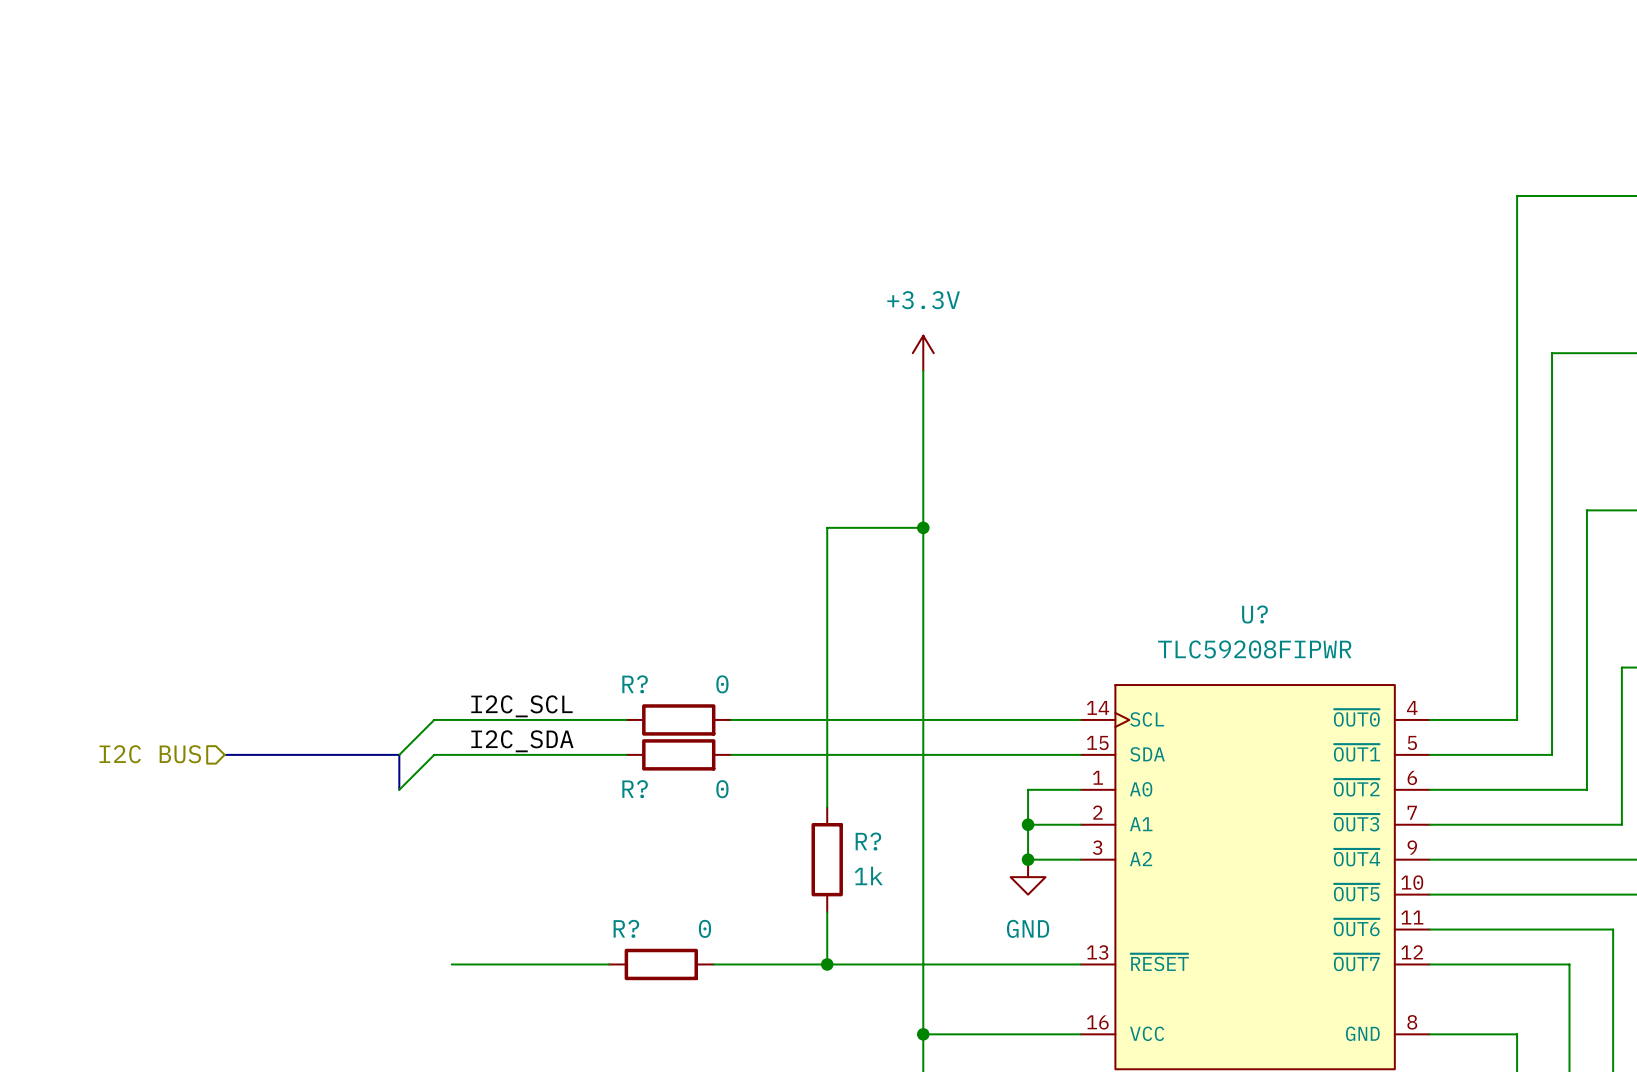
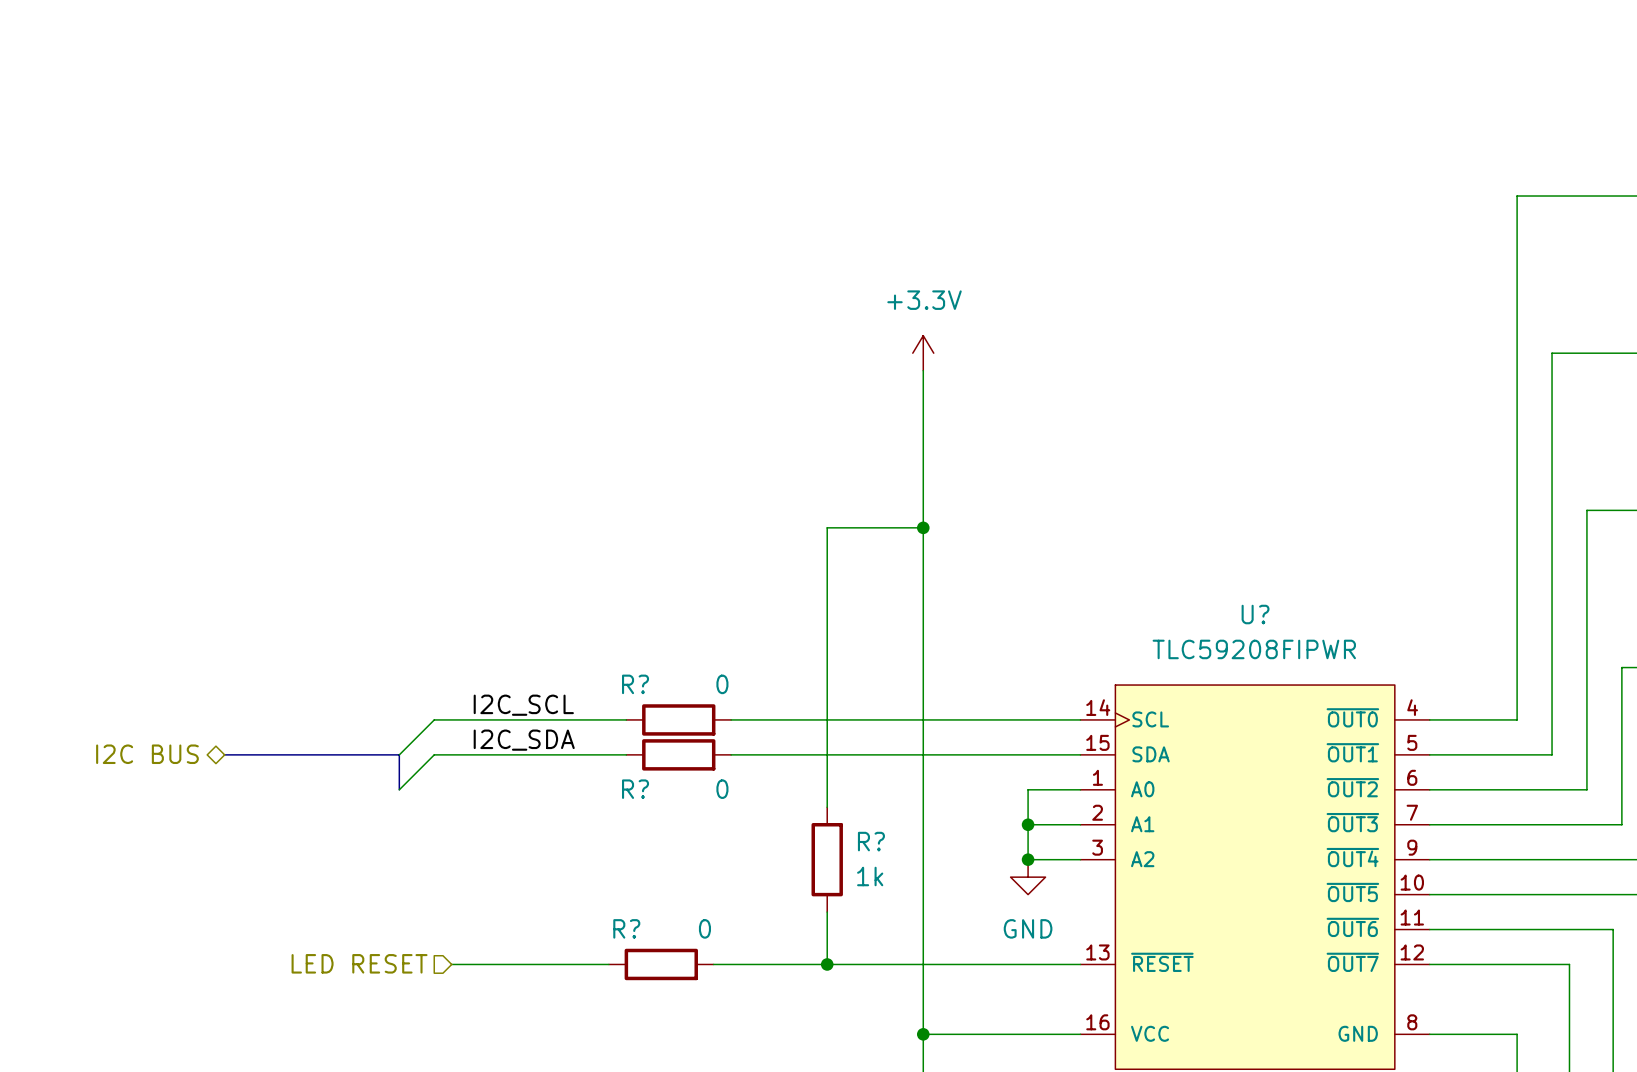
hierarchical label shape: input (150, 754) -> bidirectional (147, 754)
hierarchical label: none -> LED RESET (359, 963)

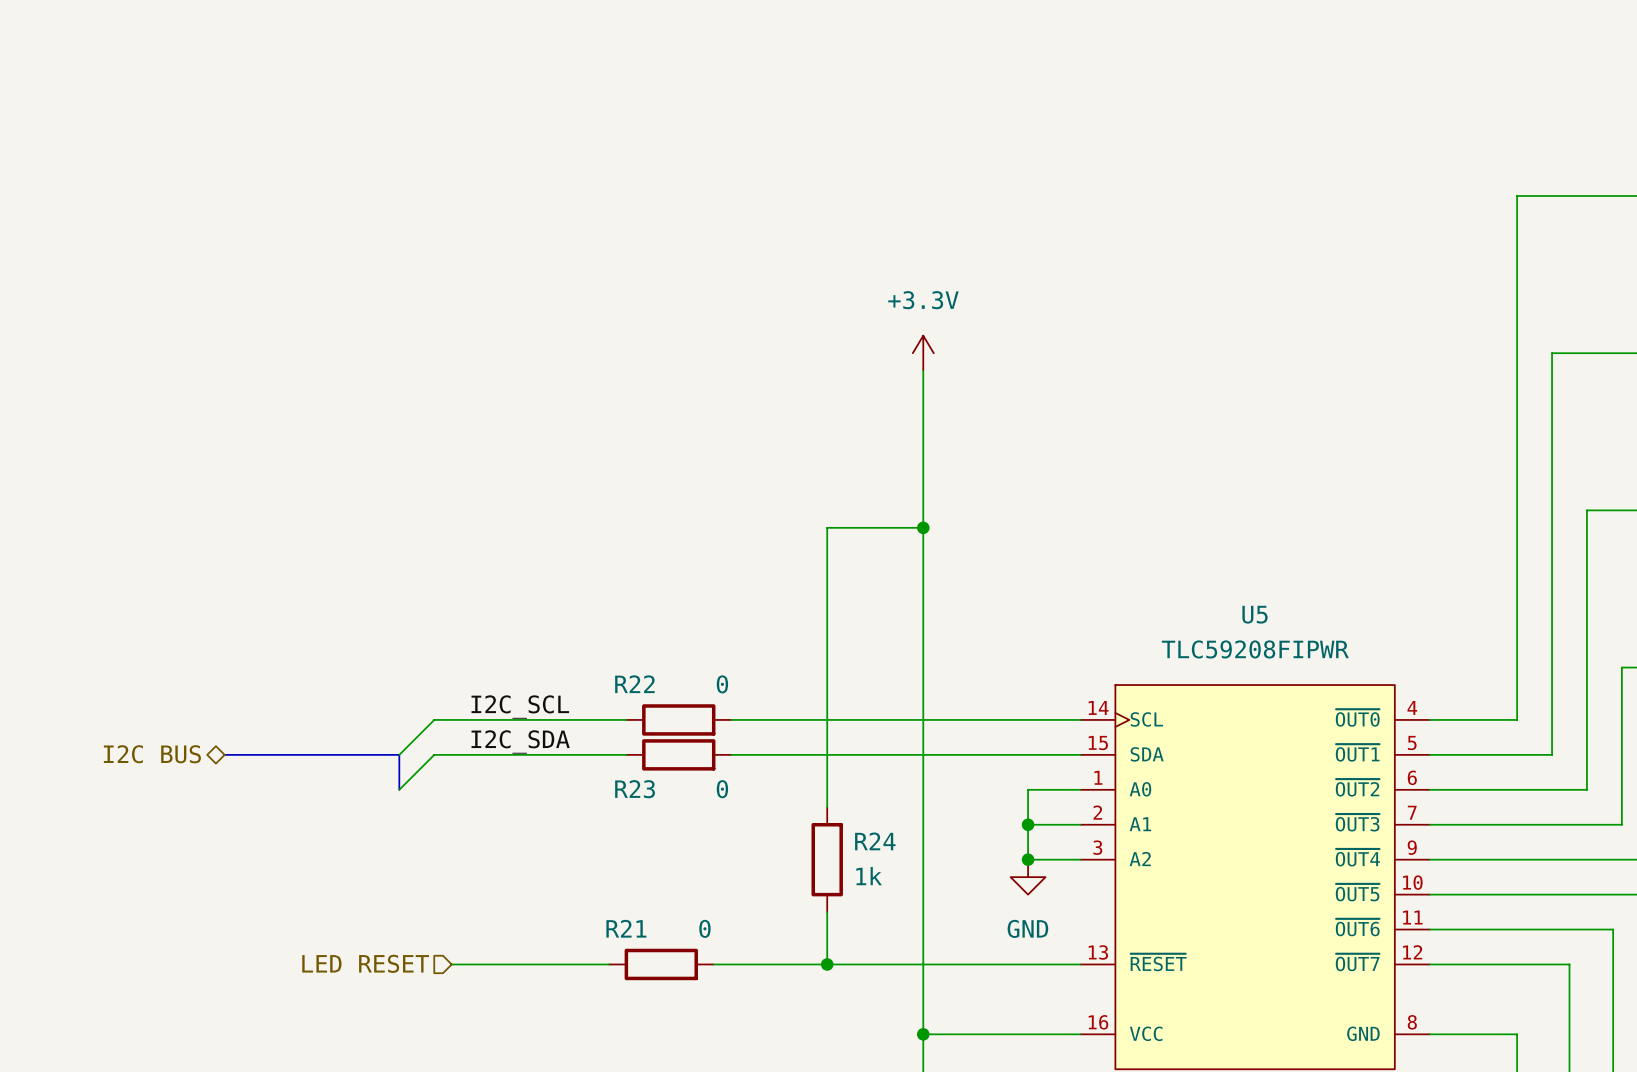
U? name: U? (1255, 614) -> U5 (1255, 614)
R? name: R? (635, 684) -> R22 (634, 684)
R? name: R? (635, 789) -> R23 (635, 789)
R? name: R? (871, 841) -> R24 (875, 841)
R? name: R? (626, 928) -> R21 (626, 928)

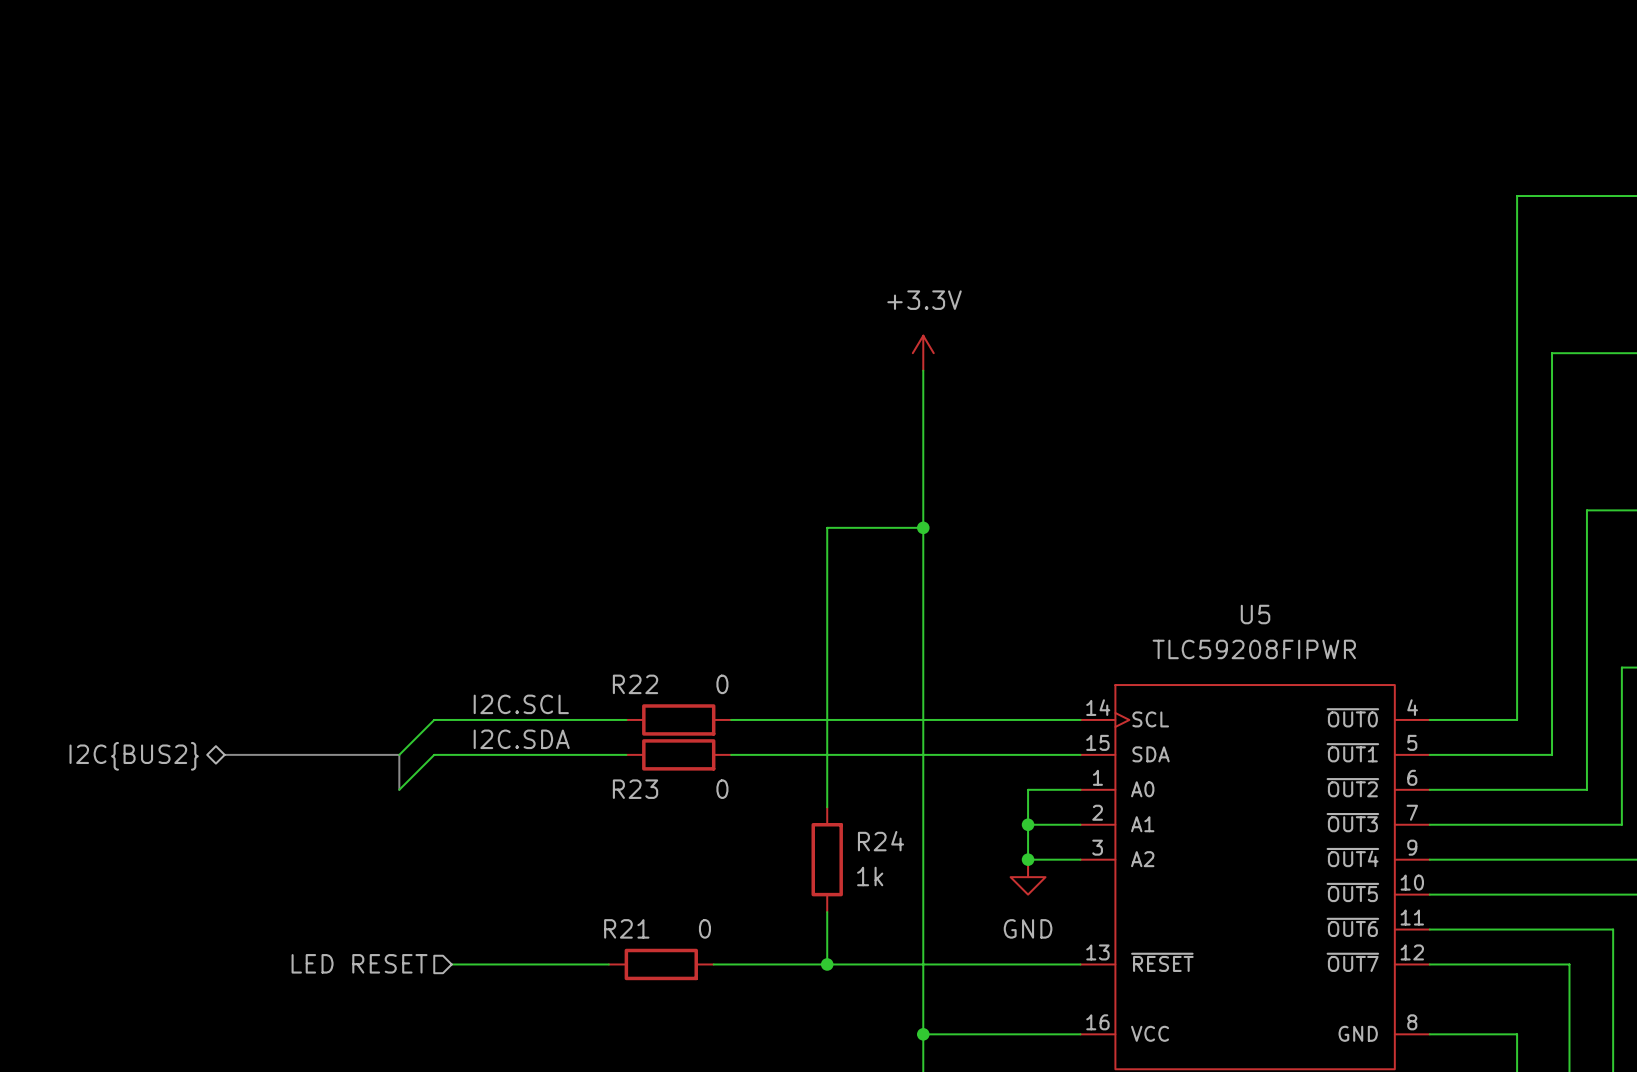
label: I2C_SCL (520, 707) -> I2C.SCL (521, 704)
label: I2C_SDA (520, 741) -> I2C.SDA (521, 739)
hierarchical label: I2C BUS (152, 754) -> I2C{BUS2} (134, 756)

